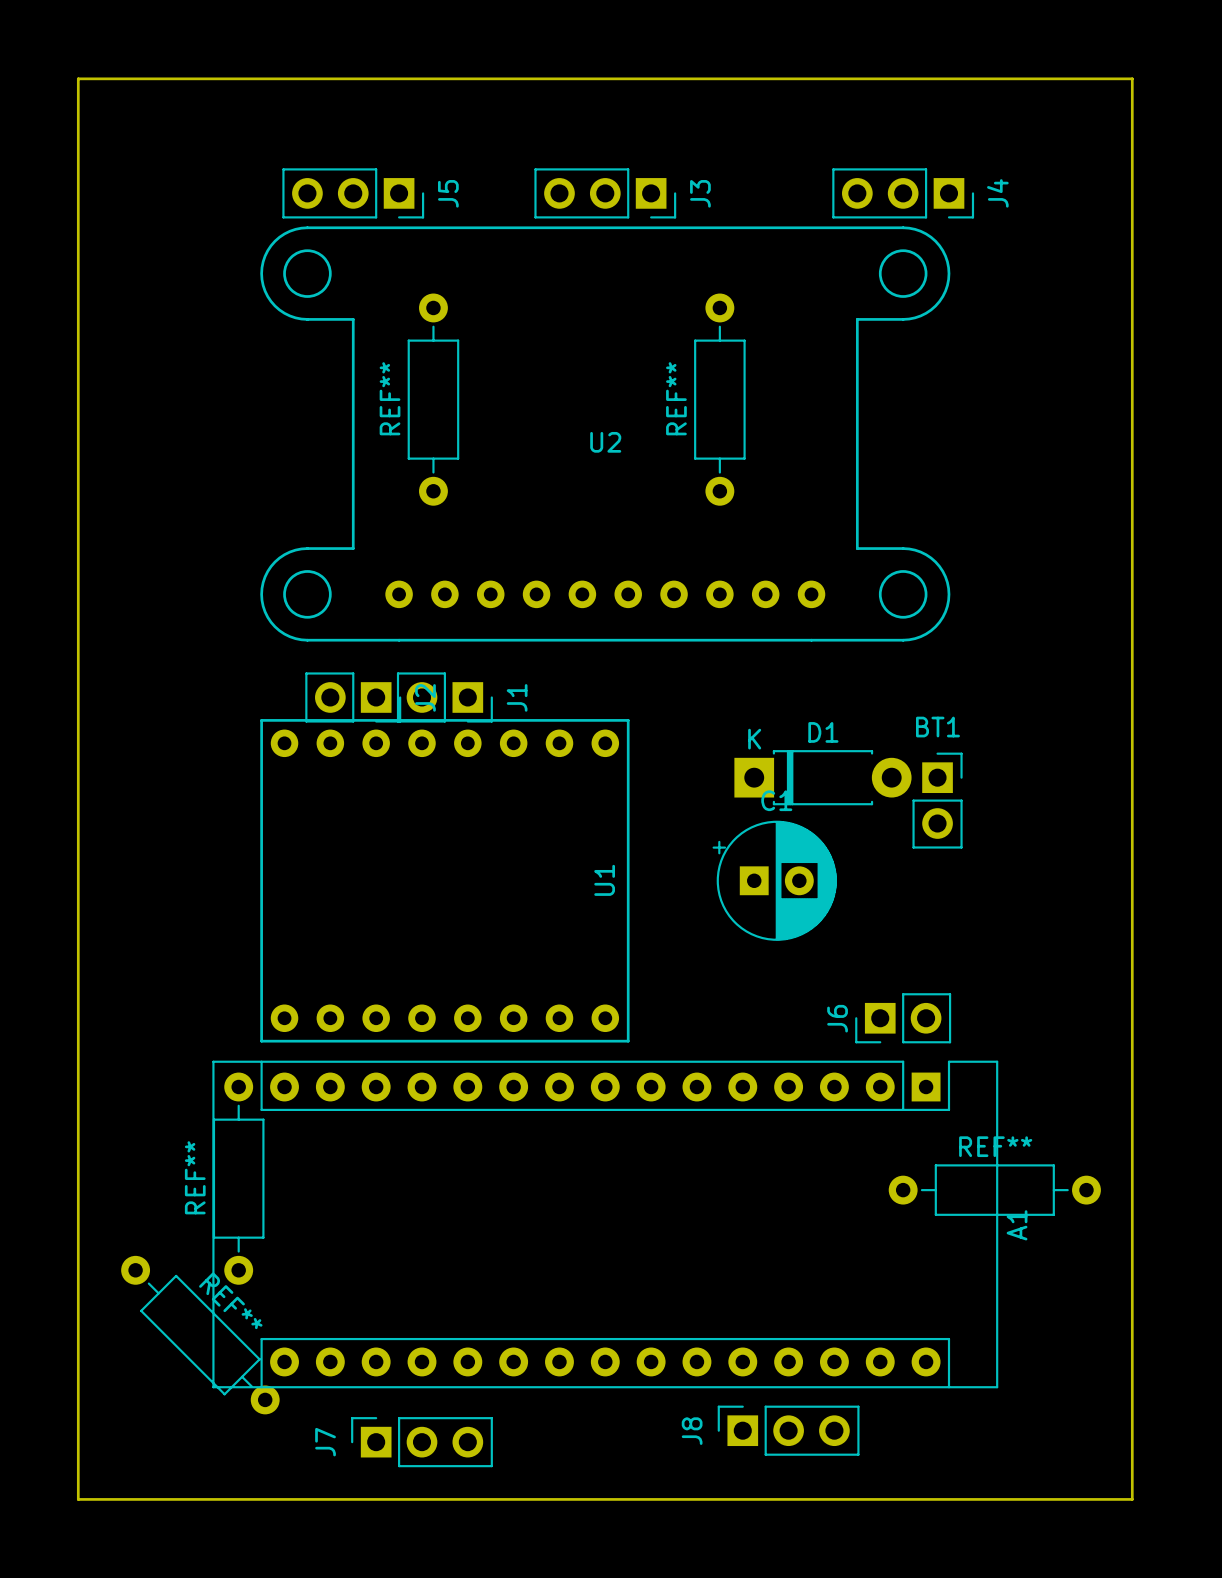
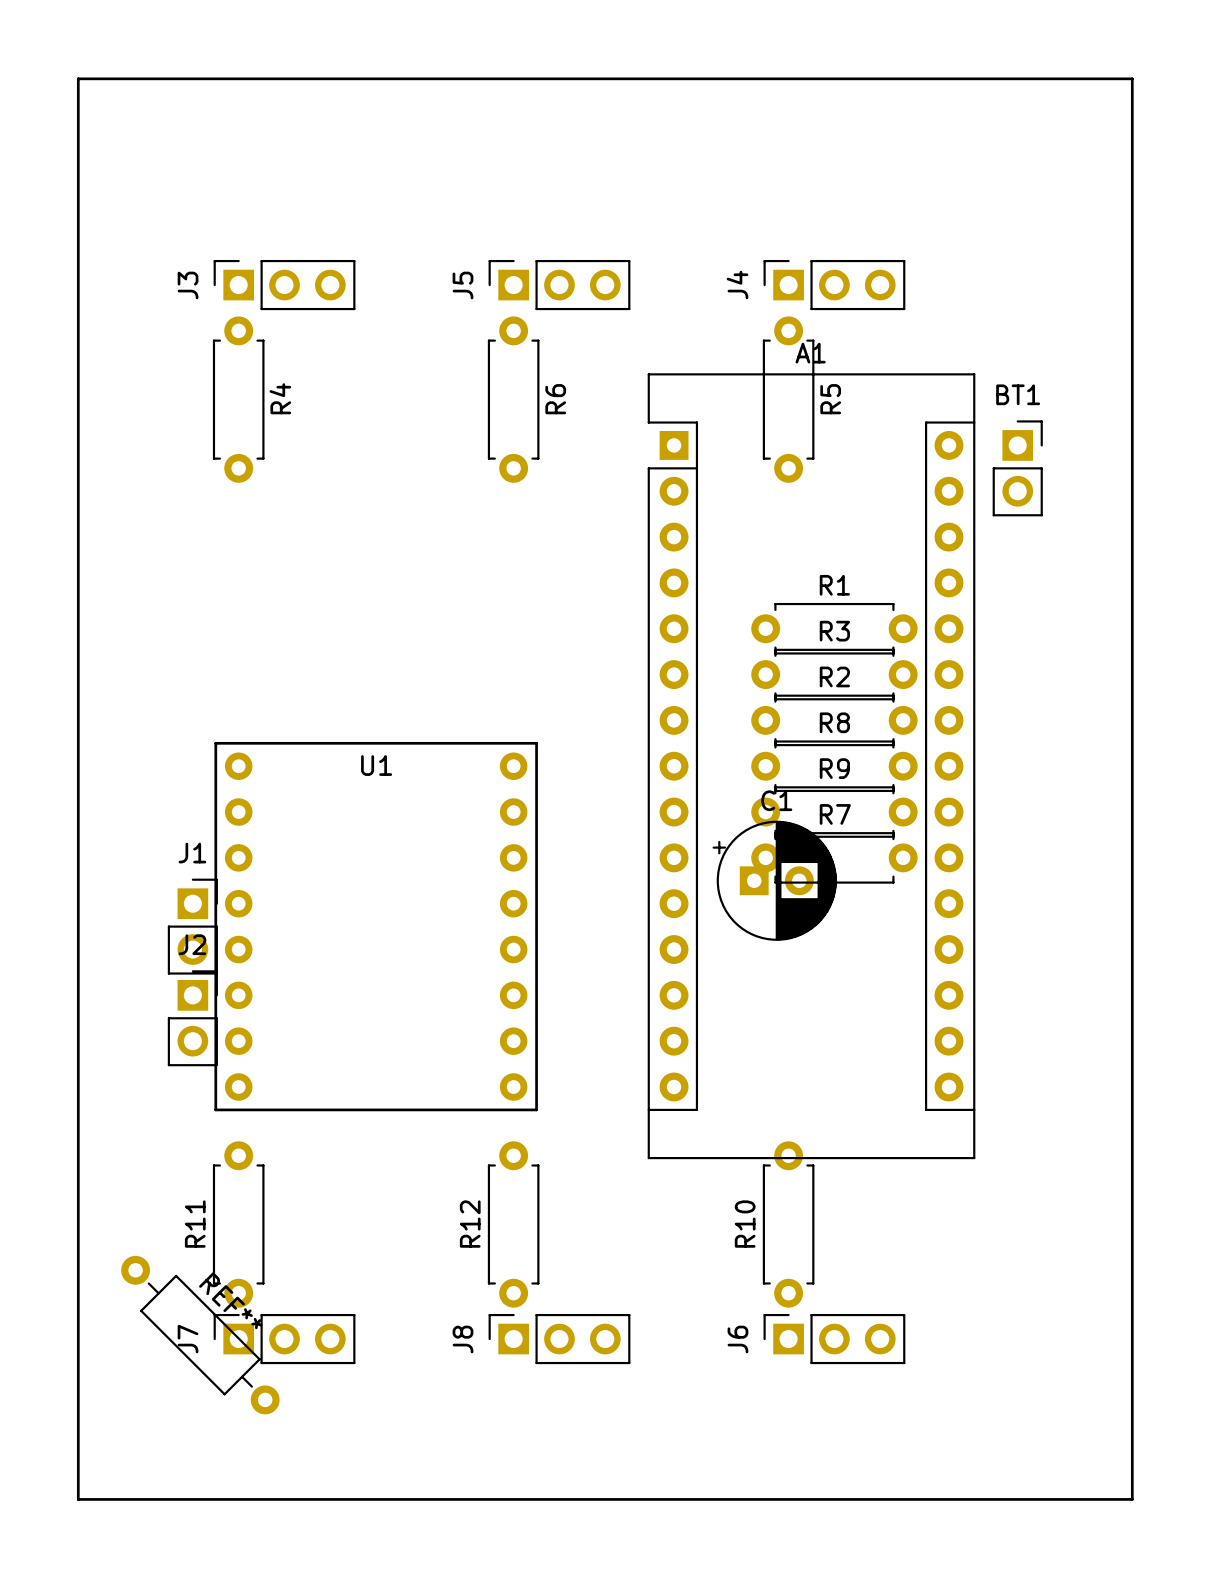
J5 rotation: 0° (353, 193) -> 180° (559, 285)
J5 position: (353, 193) -> (559, 285)
J3 rotation: 0° (605, 193) -> 180° (284, 285)
J3 position: (605, 193) -> (284, 285)
J4 rotation: 0° (903, 193) -> 180° (834, 285)
J4 position: (903, 193) -> (834, 285)
R4: none -> (238, 399)
REF**: (433, 399) -> none
R6: none -> (513, 399)
REF**: (719, 399) -> none
R5: none -> (788, 399)
U2: (605, 433) -> none
R1: none -> (834, 628)
R3: none -> (834, 674)
J2 rotation: 0° (353, 697) -> 90° counterclockwise (192, 1018)
J2 position: (353, 697) -> (192, 1018)
J1 rotation: 0° (444, 697) -> 90° counterclockwise (192, 926)
J1 position: (444, 697) -> (192, 926)
R2: none -> (834, 720)
R8: none -> (834, 766)
D1: (822, 777) -> none
BT1 position: (937, 800) -> (1017, 468)
R9: none -> (834, 812)
R7: none -> (834, 857)
U1 rotation: 0° (444, 880) -> 90° clockwise (376, 926)
U1 name position: U1 (604, 880) -> U1 (376, 765)
J6 footprint: [855, 993, 952, 1044] -> [763, 1313, 906, 1365]
REF**: (238, 1178) -> none
REF**: (994, 1190) -> none
R11: none -> (238, 1224)
R12: none -> (513, 1224)
A1 rotation: 0° (605, 1224) -> 90° counterclockwise (811, 766)
A1 position: (605, 1224) -> (811, 766)
R10: none -> (788, 1224)
J8 position: (788, 1430) -> (559, 1339)
J7 position: (422, 1442) -> (284, 1339)

